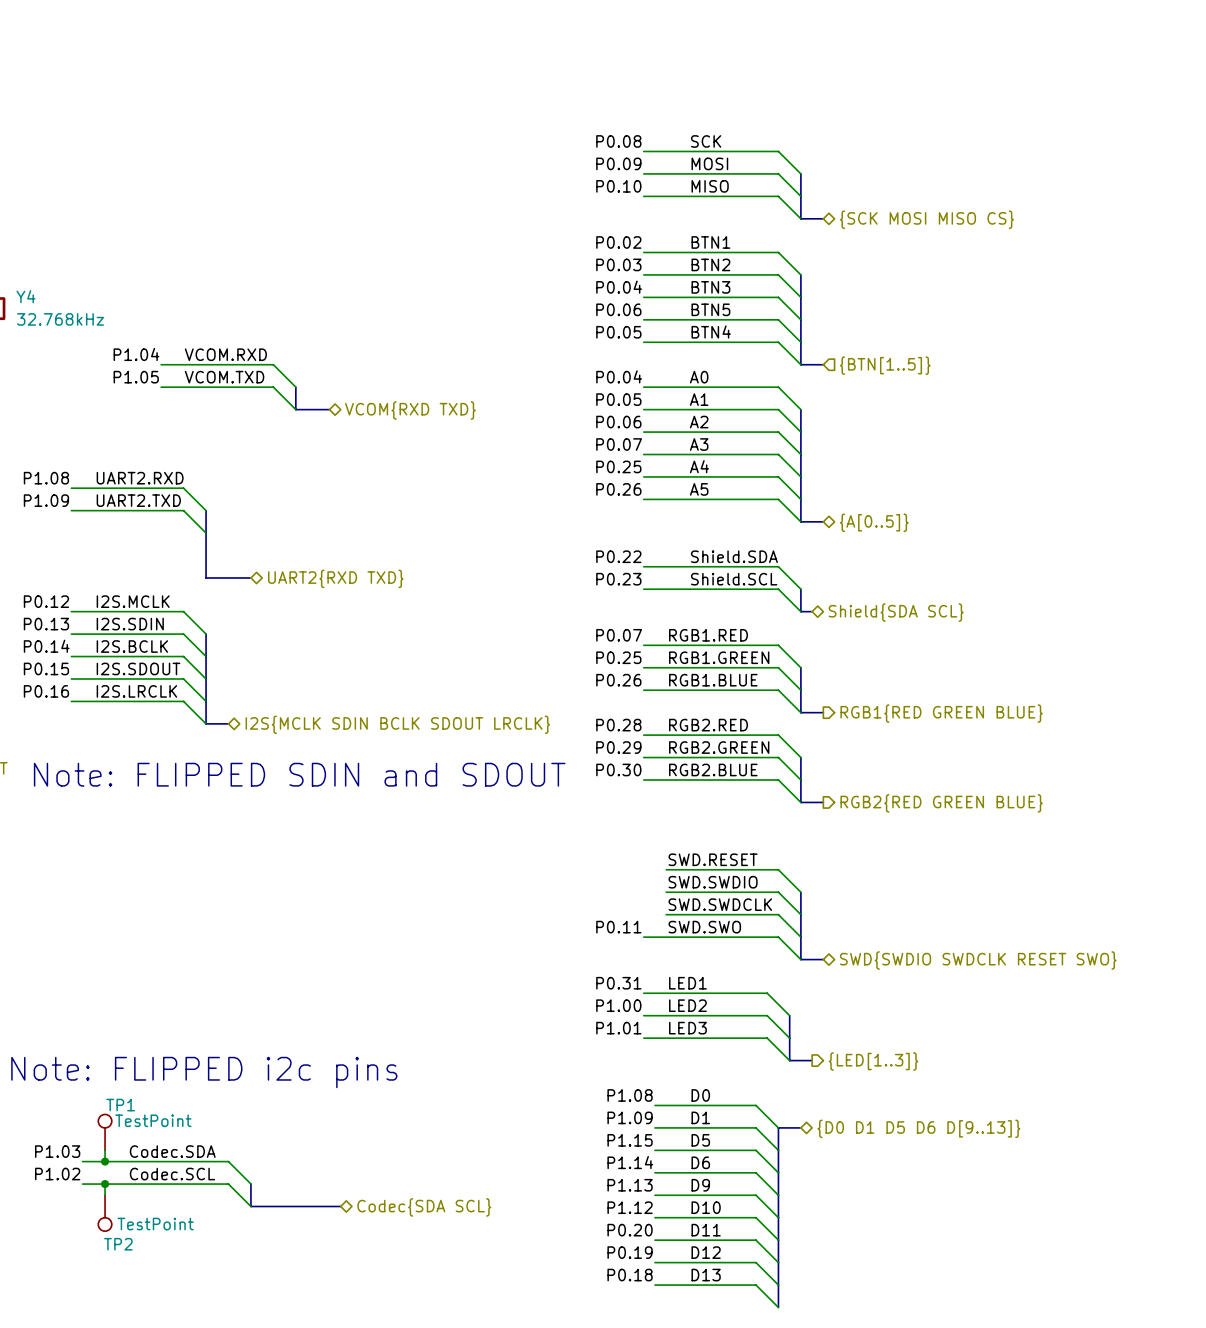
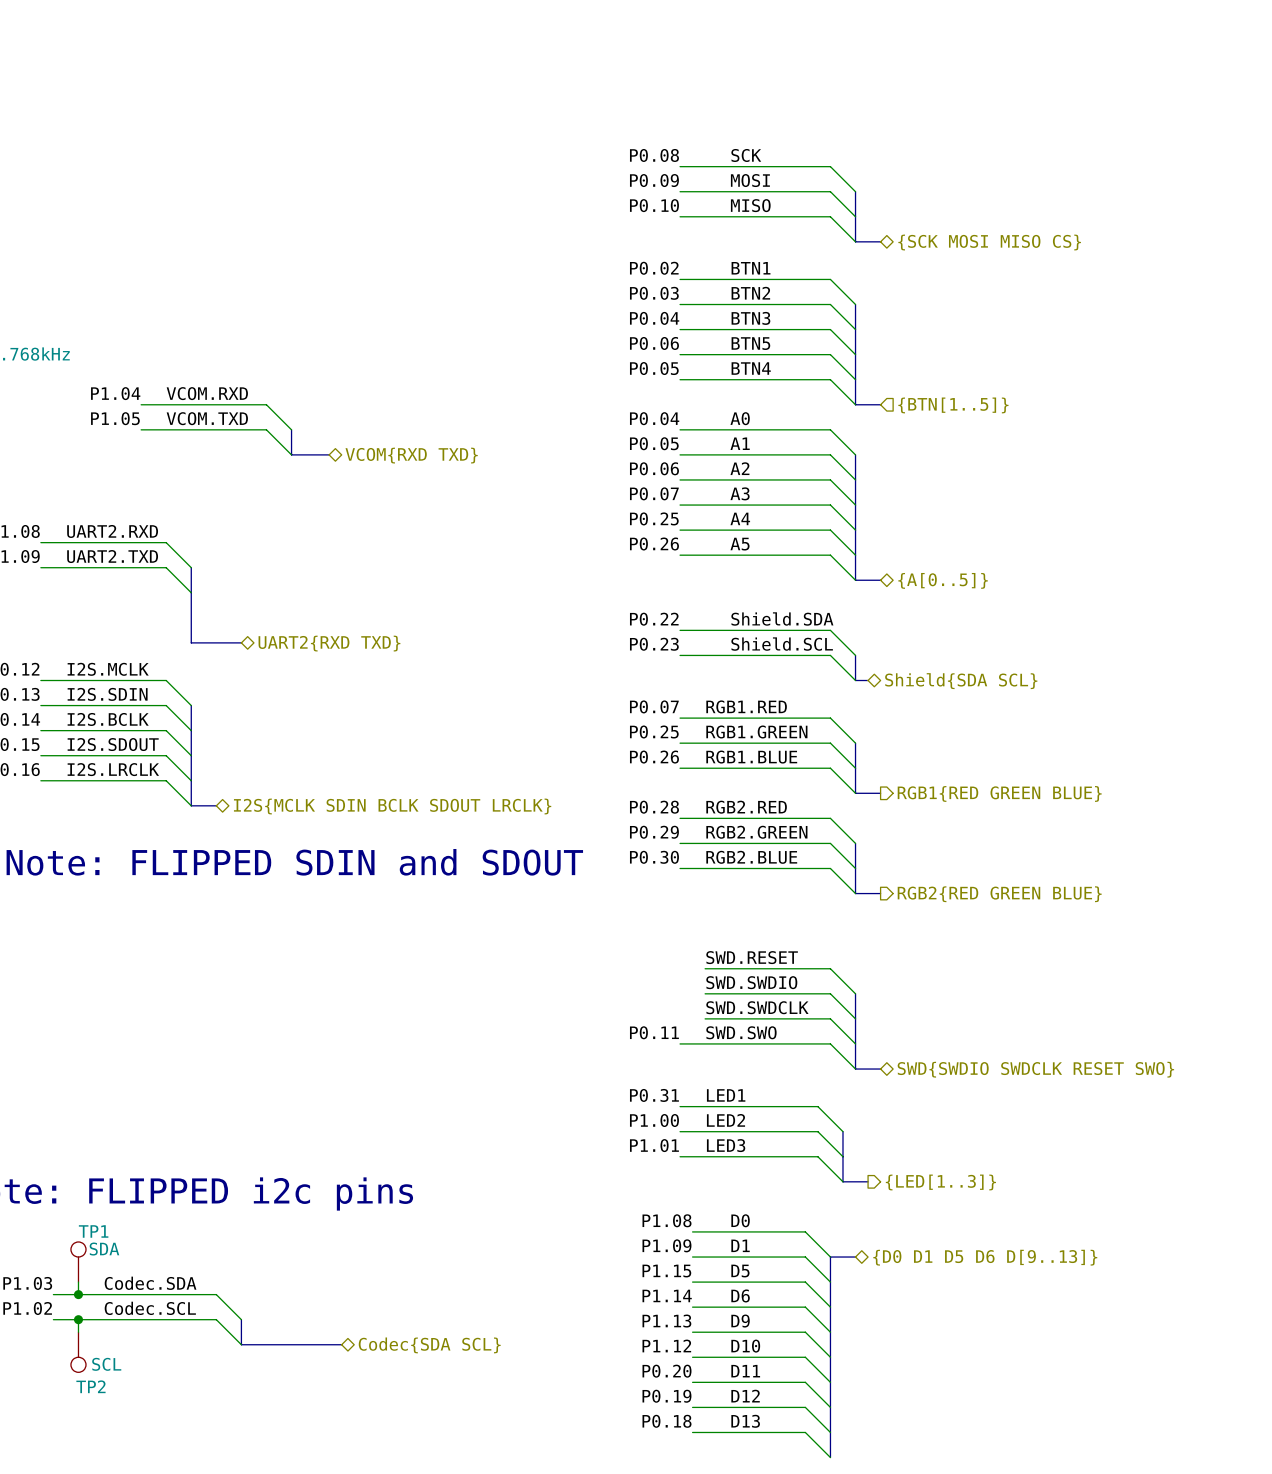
TP1 value: TestPoint (153, 1120) -> SDA (104, 1249)
TP2 value: TestPoint (155, 1224) -> SCL (106, 1364)

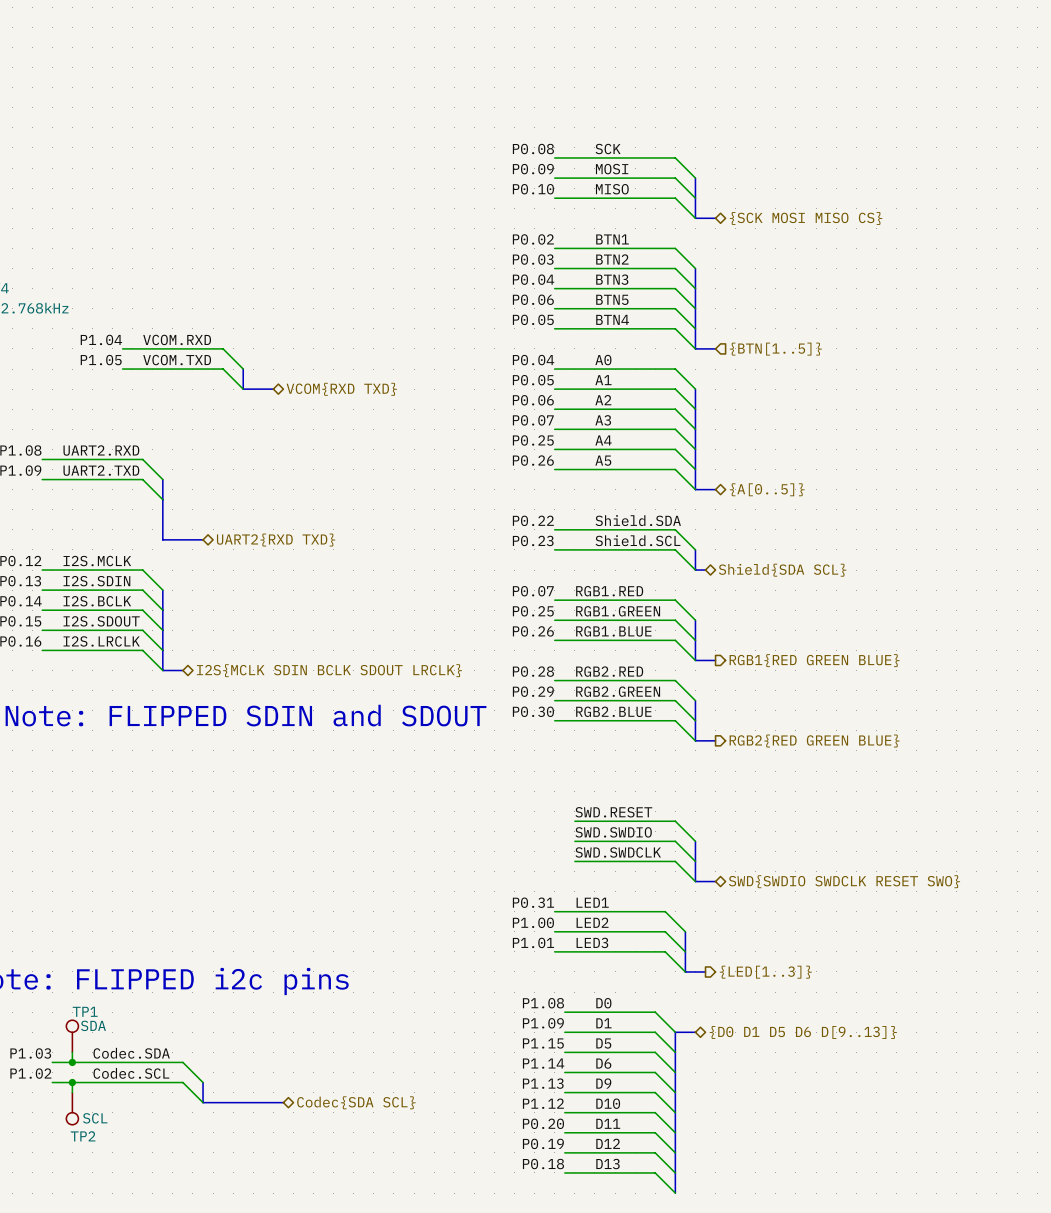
label: SWD.RESET (752, 957) -> none
wire: (705, 968) (830, 968) (855, 993) -> none
label: SWD.SWDIO (751, 982) -> SWD.RESET (613, 812)
bus: (855, 993) (855, 1018) -> none
label: SWD.SWDCLK (757, 1007) -> SWD.SWDIO (613, 832)
label: P0.11 (654, 1032) -> none
label: SWD.SWO (741, 1032) -> SWD.SWDCLK (618, 852)
wire: (680, 1043) (705, 1043) -> none

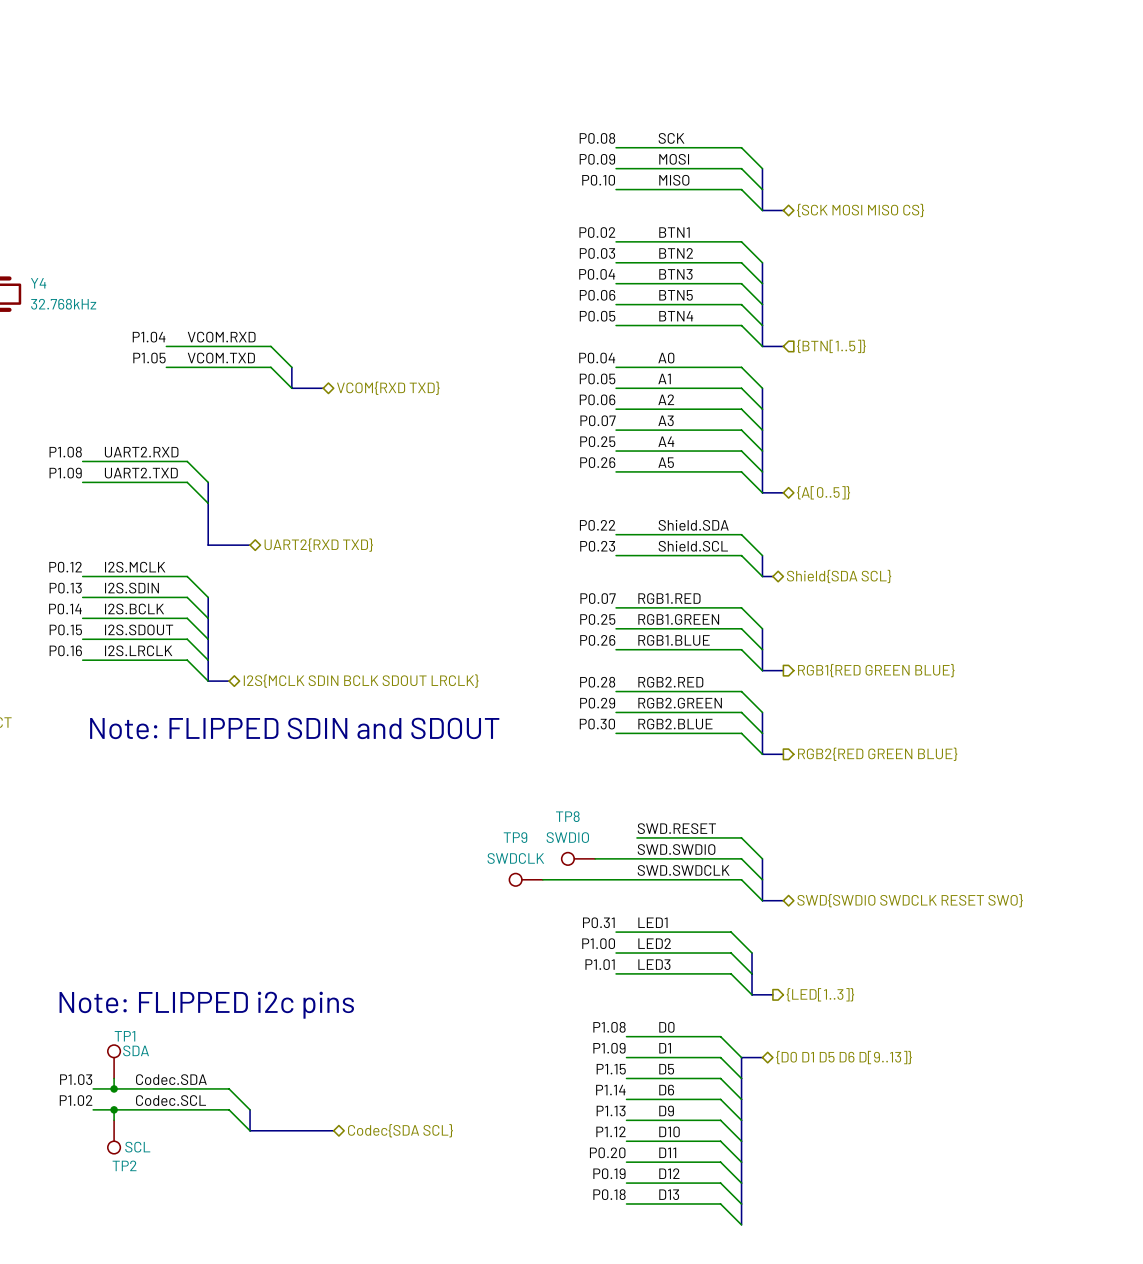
TP8: none -> SWDIO (578, 858)
wire: none -> (595, 858) (636, 858)
TP9: none -> SWDCLK (526, 879)
wire: none -> (542, 879) (636, 879)

